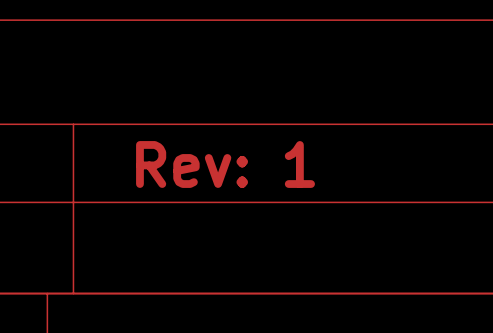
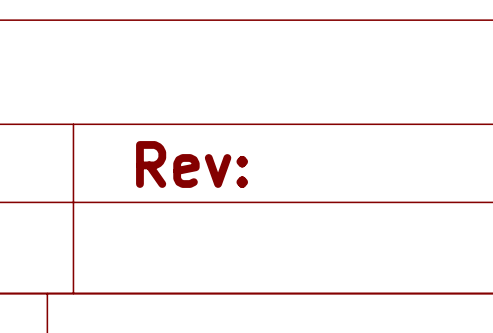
title block: Rev: 1 (225, 164) -> Rev: (192, 164)

